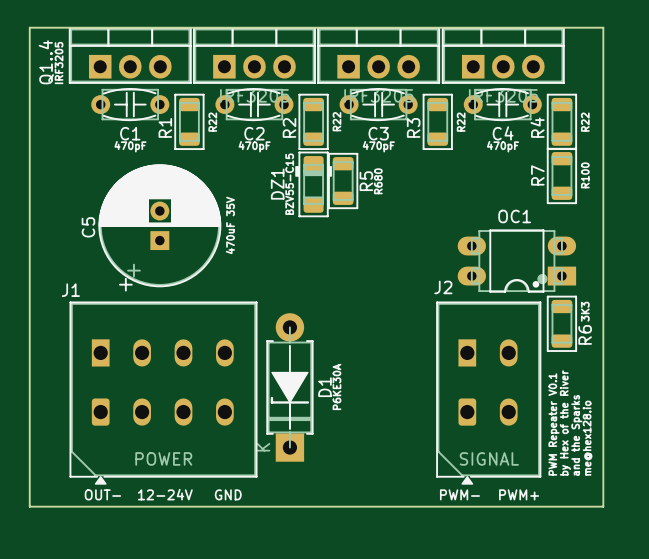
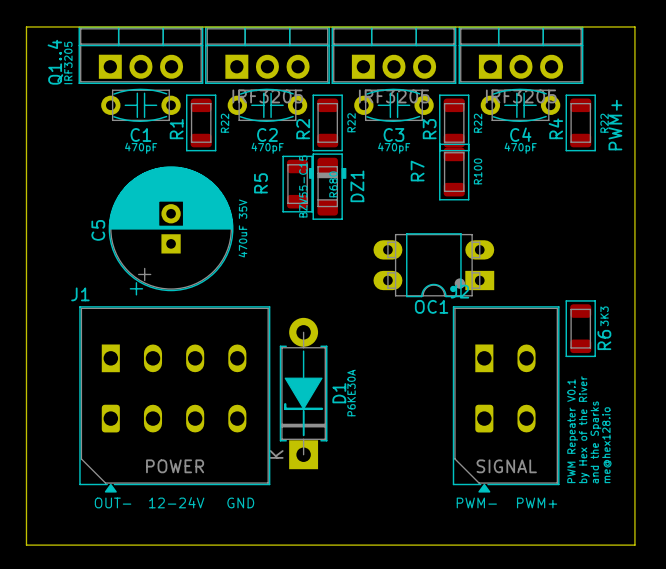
board edge: (29, 27) (29, 506) (603, 506) (603, 27) -> (38, 26) (26, 26) (26, 545) (634, 545) (634, 26) (622, 26)
text: none -> PWM+ (615, 125)
R7 name position: R7 (537, 175) -> R7 (417, 171)
R7 position: (561, 175) -> (454, 172)
R5 position: (343, 181) -> (297, 184)
R5 name position: R5 (366, 181) -> R5 (260, 183)
DZ1 name position: DZ1 (277, 184) -> DZ1 (357, 186)
OC1 name position: OC1 (514, 216) -> OC1 (431, 306)
OC1 position: (516, 261) -> (433, 265)

